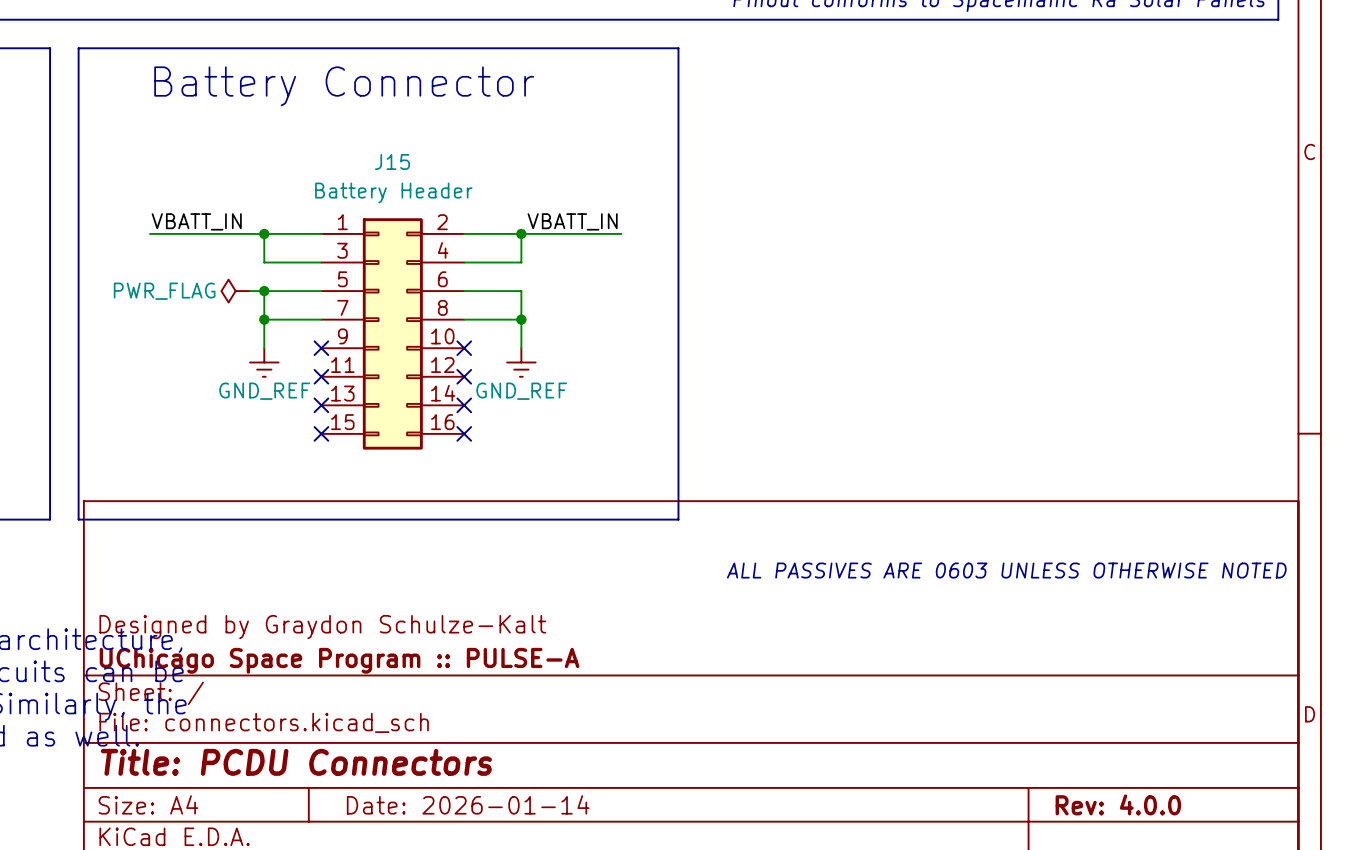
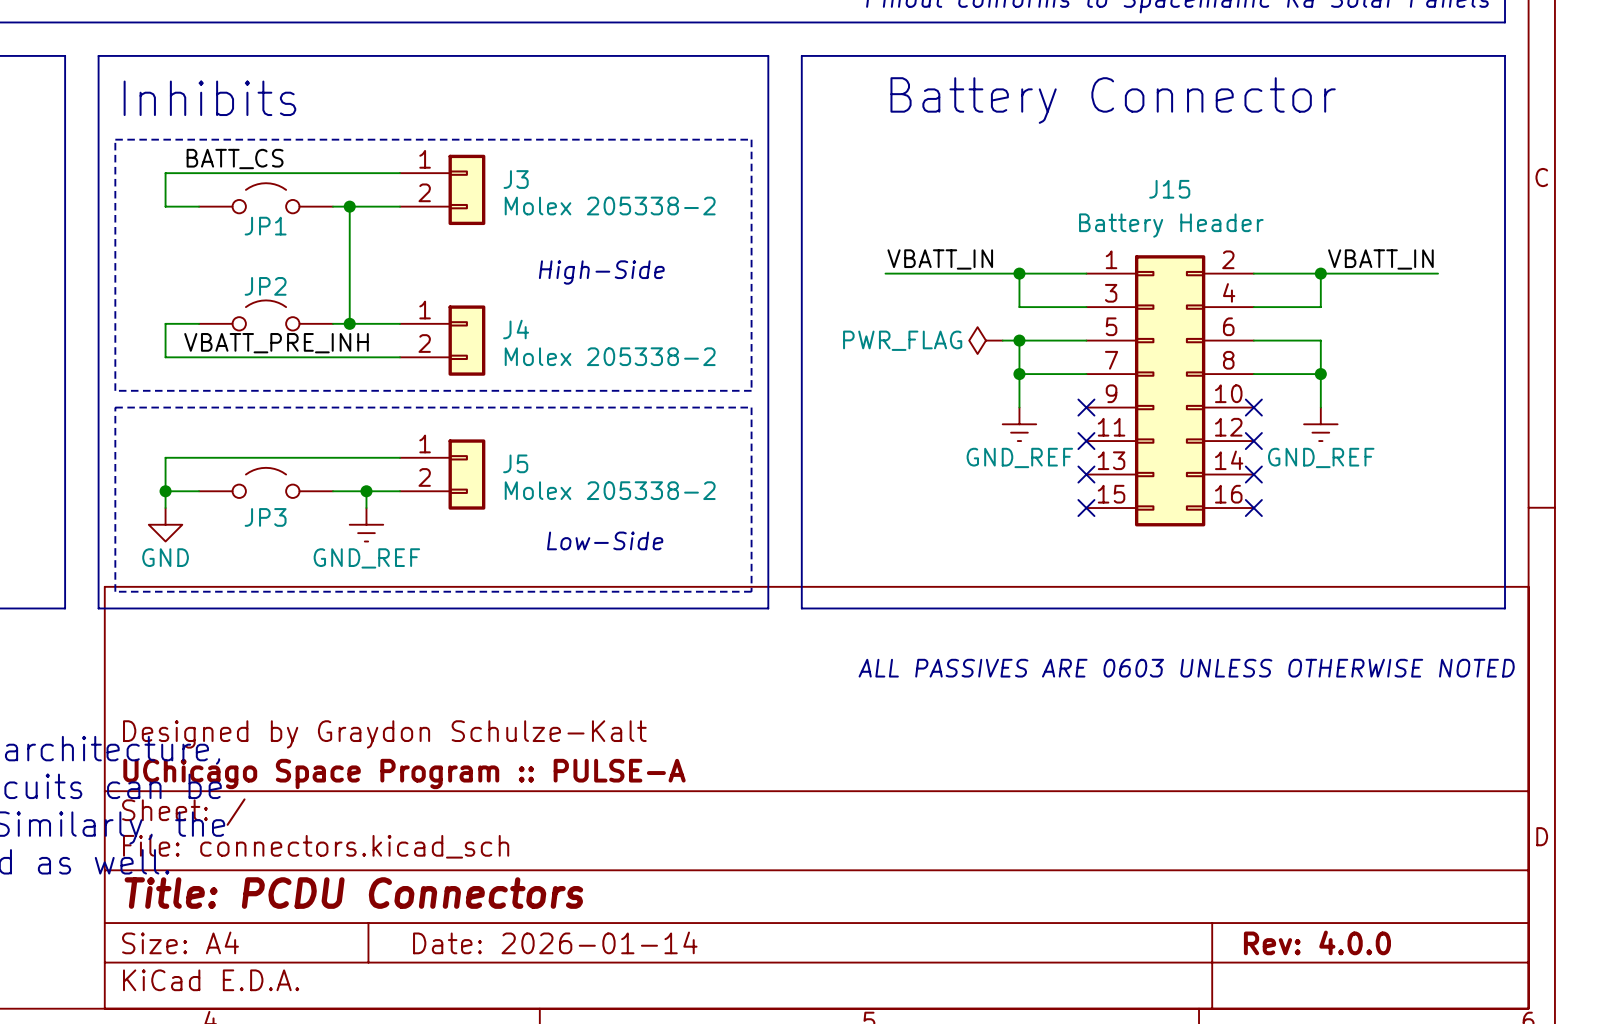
line: (649, 48) (678, 48) -> (768, 55) (768, 608)
text: none -> Inhibits (209, 98)
text: Battery Connector (344, 86) -> none
text: none -> Battery Connector (1113, 100)
line: none -> (115, 139) (115, 390) (751, 390) (751, 139) (115, 139)
label: none -> BATT_CS (235, 159)
wire: none -> (399, 173) (165, 173) (165, 206) (199, 206)
J3: none -> Molex 205338-2 (442, 189)
JP1: none -> (266, 198)
wire: none -> (332, 206) (399, 206)
wire: none -> (349, 206) (349, 323)
junction: none -> (349, 206)
label: VBATT_IN (196, 221) -> none
label position: VBATT_IN (572, 221) -> VBATT_IN (940, 259)
label: none -> VBATT_IN (1380, 259)
text: none -> High-Side (601, 272)
wire: (150, 233) (321, 233) -> none
wire: (264, 233) (264, 262) (321, 262) -> none
junction: (264, 233) -> none
wire: (464, 233) (621, 233) -> none
wire: (521, 233) (521, 262) (464, 262) -> none
junction: (521, 233) -> none
wire: none -> (885, 273) (1086, 273)
wire: none -> (1019, 273) (1019, 307) (1086, 307)
junction: none -> (1019, 273)
wire: none -> (1253, 273) (1438, 273)
wire: none -> (1320, 273) (1320, 307) (1253, 307)
junction: none -> (1320, 273)
JP2: none -> (266, 315)
wire: none -> (199, 323) (165, 323) (165, 357) (399, 357)
junction: none -> (349, 323)
power symbol: PWR_FLAG (235, 291) -> none
wire: (250, 291) (321, 291) -> none
wire: (264, 291) (264, 348) -> none
junction: (264, 291) -> none
J4: none -> Molex 205338-2 (442, 340)
wire: (464, 291) (521, 291) (521, 348) -> none
power symbol: none -> PWR_FLAG (985, 340)
wire: none -> (1002, 340) (1086, 340)
wire: none -> (1019, 340) (1019, 407)
junction: none -> (1019, 340)
wire: none -> (1253, 340) (1320, 340) (1320, 407)
label: none -> VBATT_PRE_INH (276, 343)
wire: (264, 319) (321, 319) -> (332, 323) (399, 323)
junction: (264, 319) -> none
wire: (464, 319) (521, 319) -> (332, 491) (399, 491)
junction: (521, 319) -> none
wire: none -> (1019, 374) (1086, 374)
junction: none -> (1019, 374)
wire: none -> (1253, 374) (1320, 374)
junction: none -> (1320, 374)
J15 position: (392, 333) -> (1170, 390)
line: none -> (115, 407) (751, 407) (751, 591) (115, 591) (115, 407)
no-connect mark: (321, 348) -> none
no-connect mark: (464, 348) -> none
no-connect mark: none -> (1086, 407)
no-connect mark: none -> (1253, 407)
power symbol position: GND_REF (264, 362) -> GND_REF (366, 524)
power symbol: GND_REF (521, 362) -> none
power symbol: none -> GND_REF (1019, 424)
power symbol: none -> GND_REF (1320, 424)
no-connect mark: (321, 376) -> none
no-connect mark: (464, 376) -> none
no-connect mark: none -> (1086, 441)
no-connect mark: none -> (1253, 441)
wire: none -> (399, 457) (165, 457) (165, 508)
no-connect mark: (321, 405) -> none
J5: none -> Molex 205338-2 (442, 474)
no-connect mark: (464, 405) -> none
no-connect mark: none -> (1086, 474)
no-connect mark: none -> (1253, 474)
JP3: none -> (266, 482)
wire: none -> (165, 491) (199, 491)
junction: none -> (165, 491)
wire: none -> (366, 491) (366, 508)
junction: none -> (366, 491)
no-connect mark: (321, 433) -> none
no-connect mark: (464, 433) -> none
no-connect mark: none -> (1086, 508)
no-connect mark: none -> (1253, 508)
power symbol: none -> GND (165, 524)
text: none -> Low-Side (605, 540)
line: (649, 519) (678, 519) -> (801, 55) (1505, 55) (1505, 608) (801, 608)

